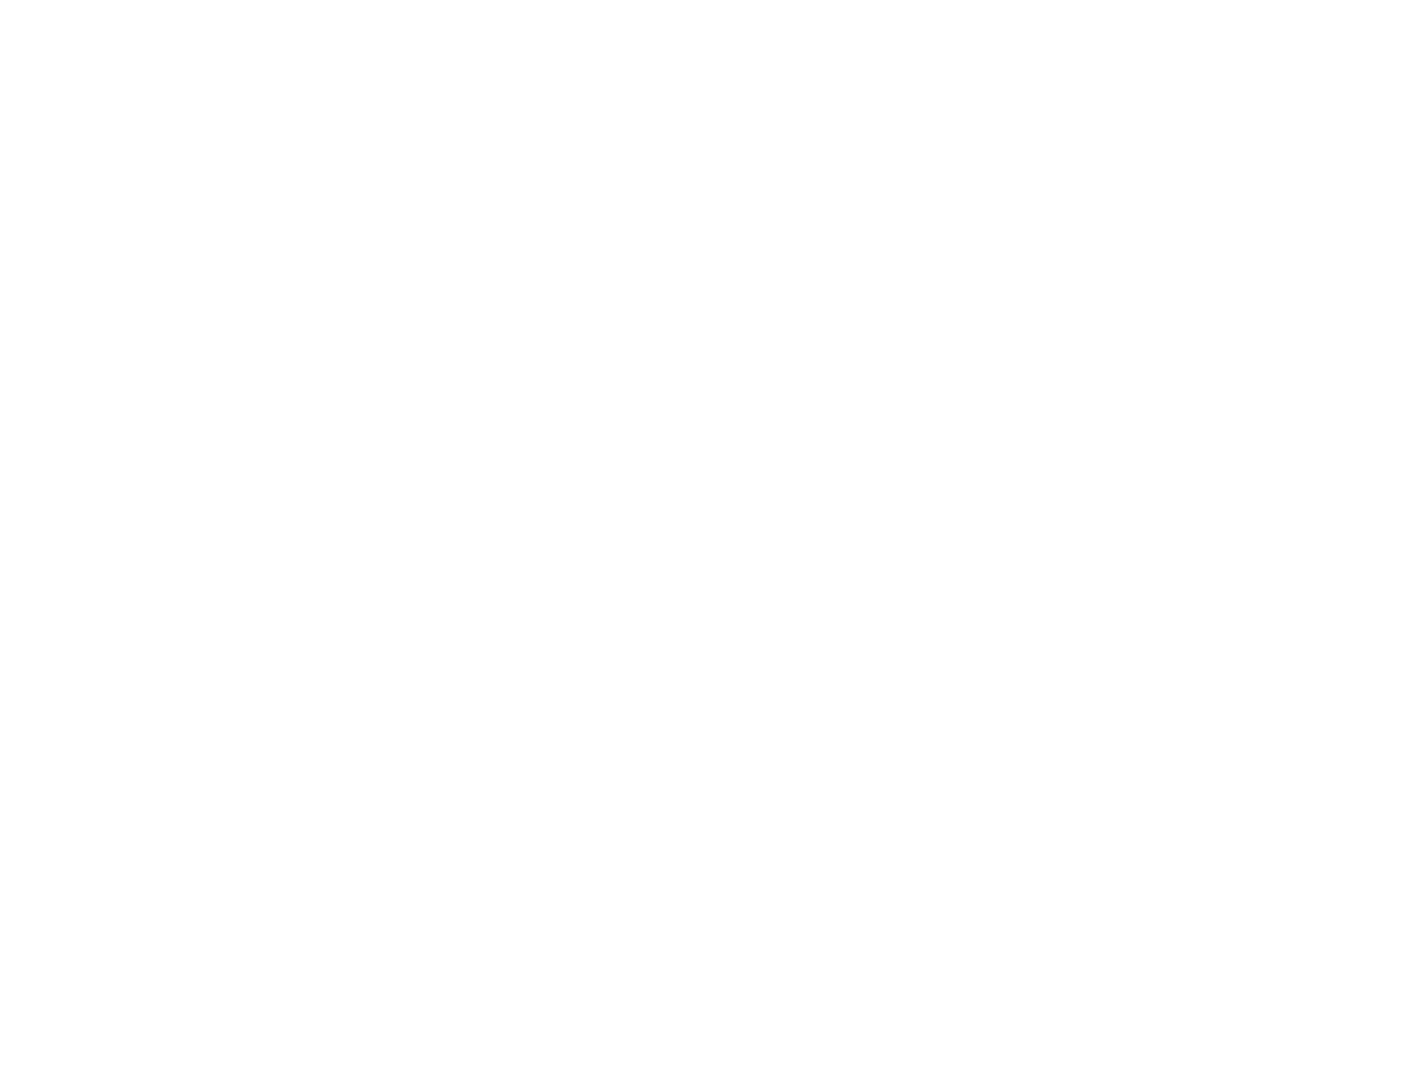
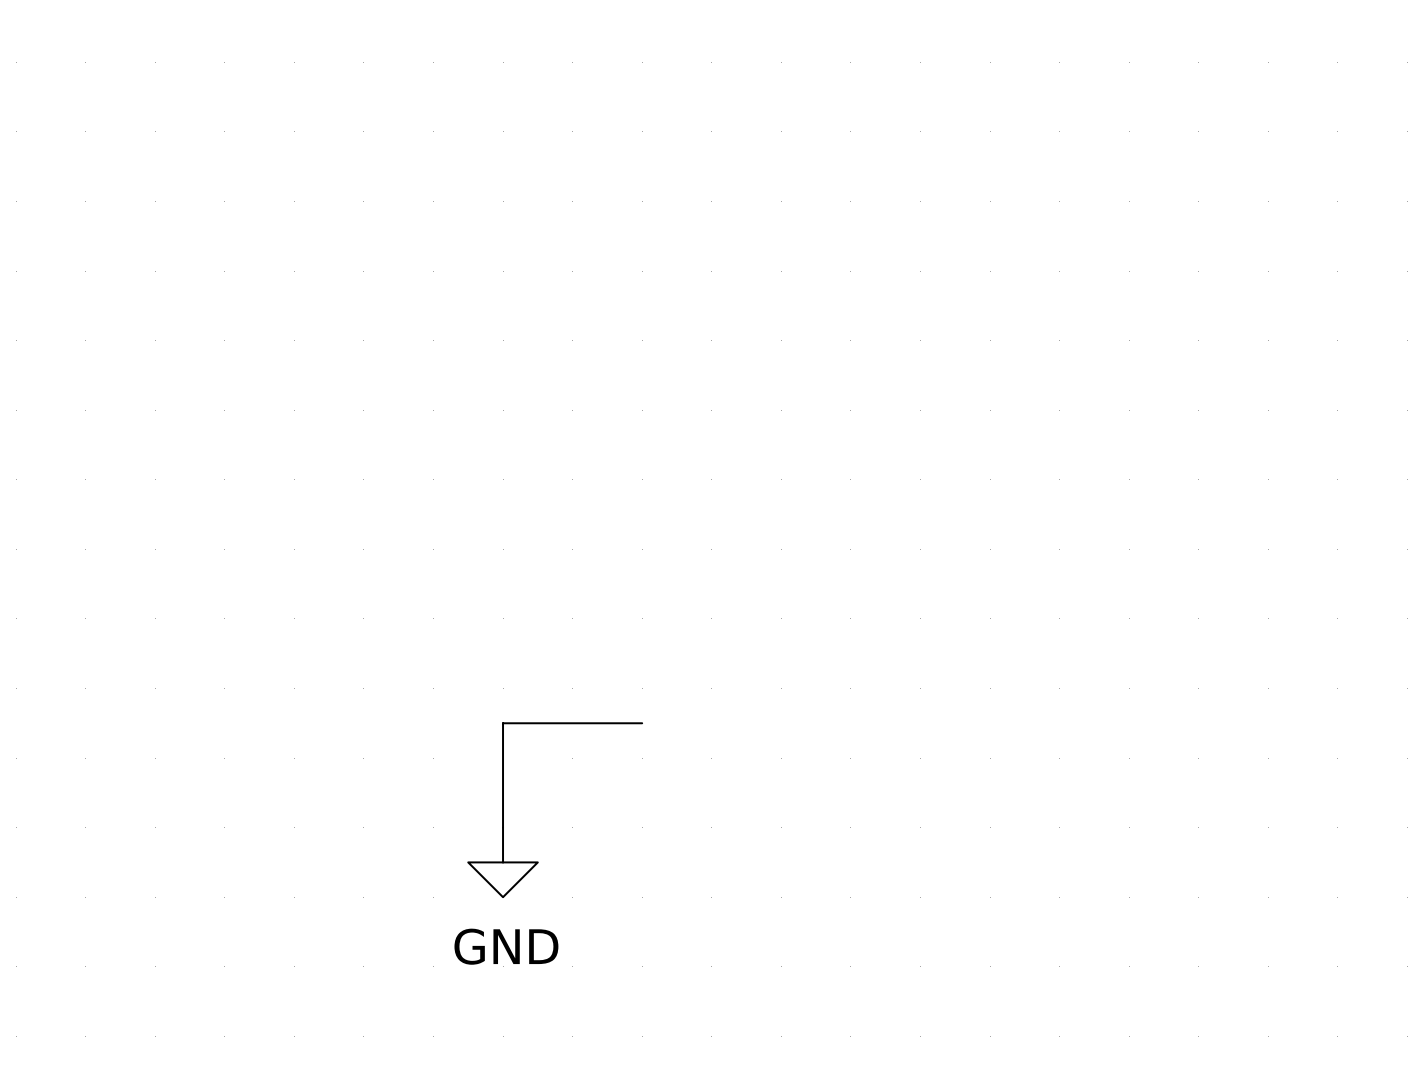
wire: none -> (642, 723) (503, 723) (503, 827)
power symbol: none -> GND (503, 862)

